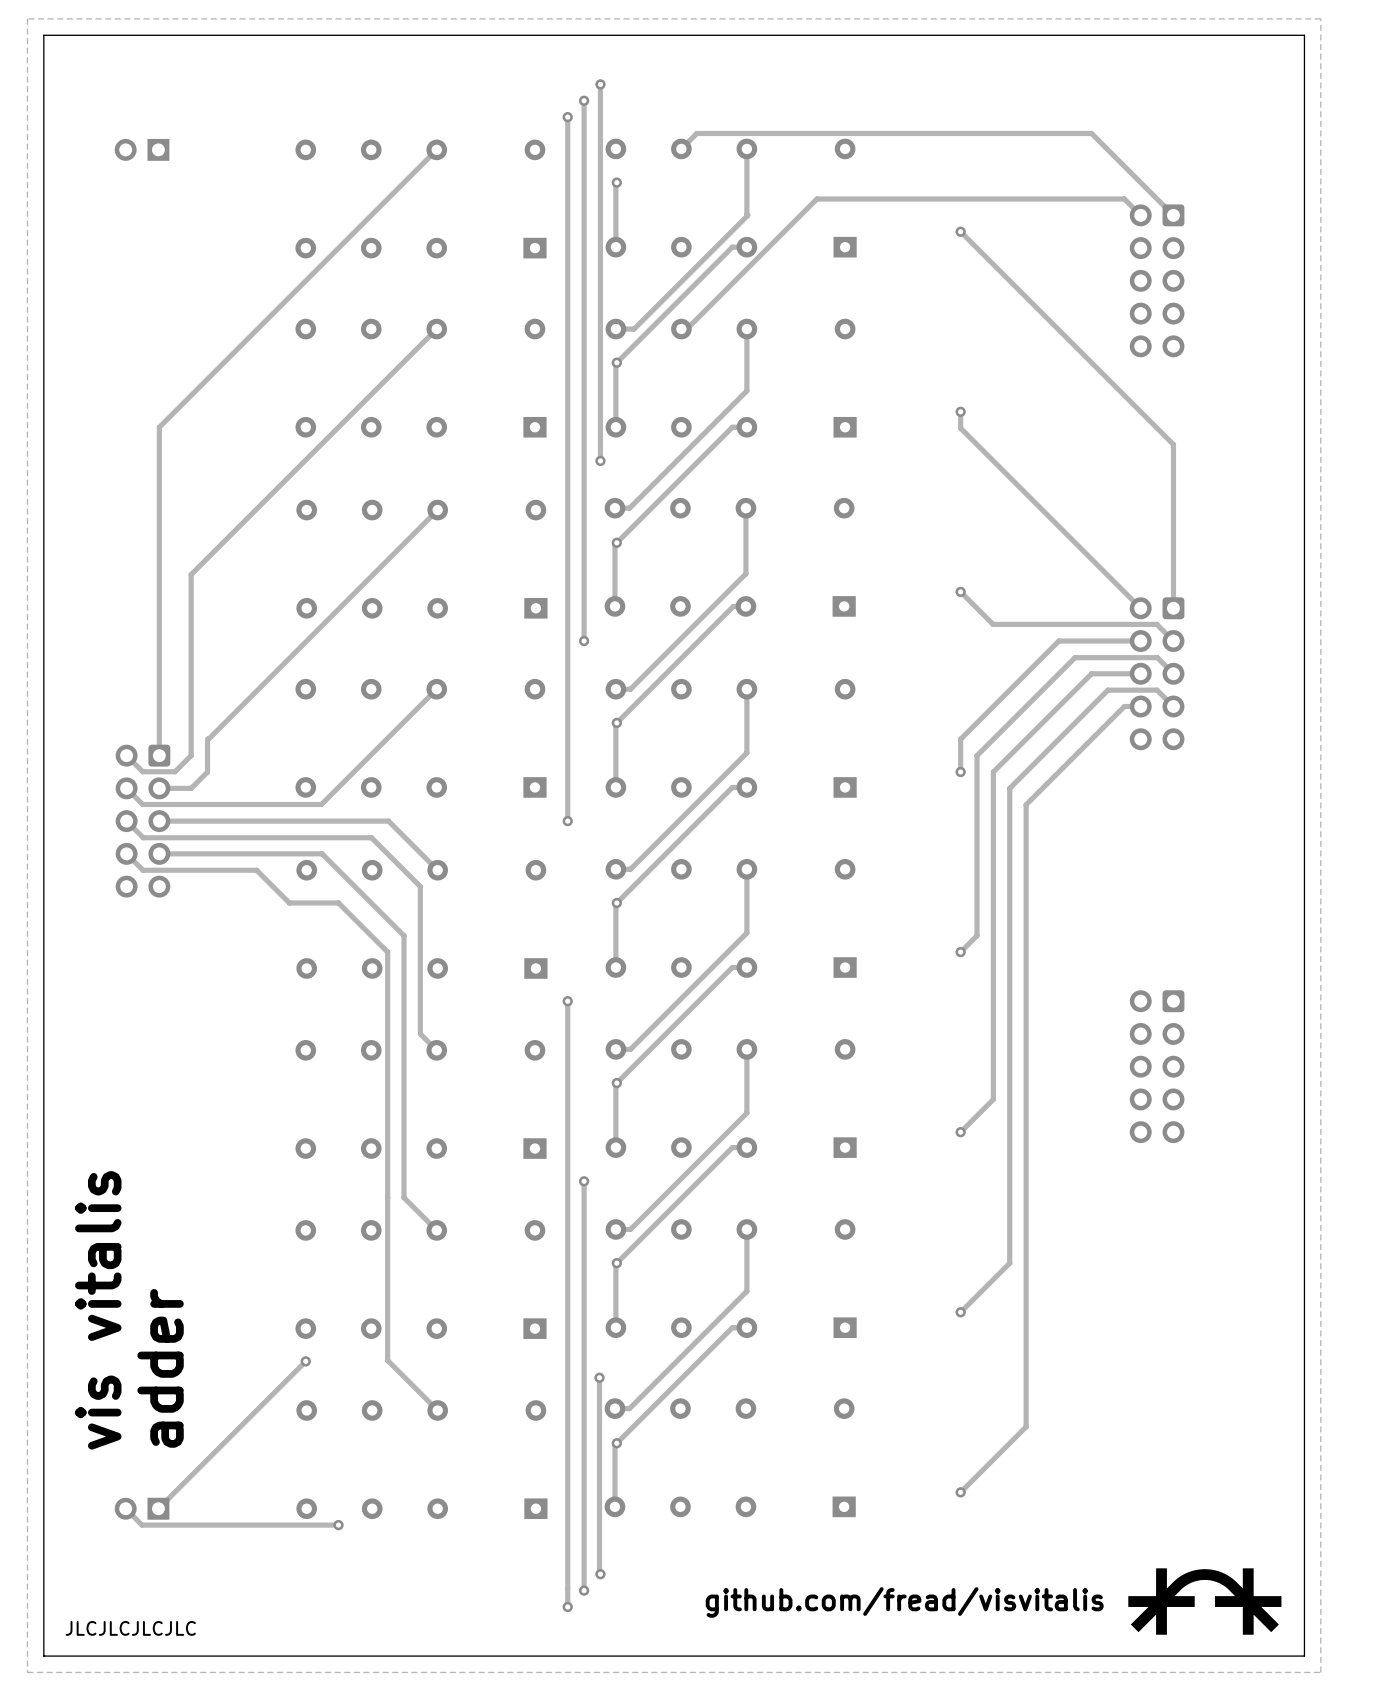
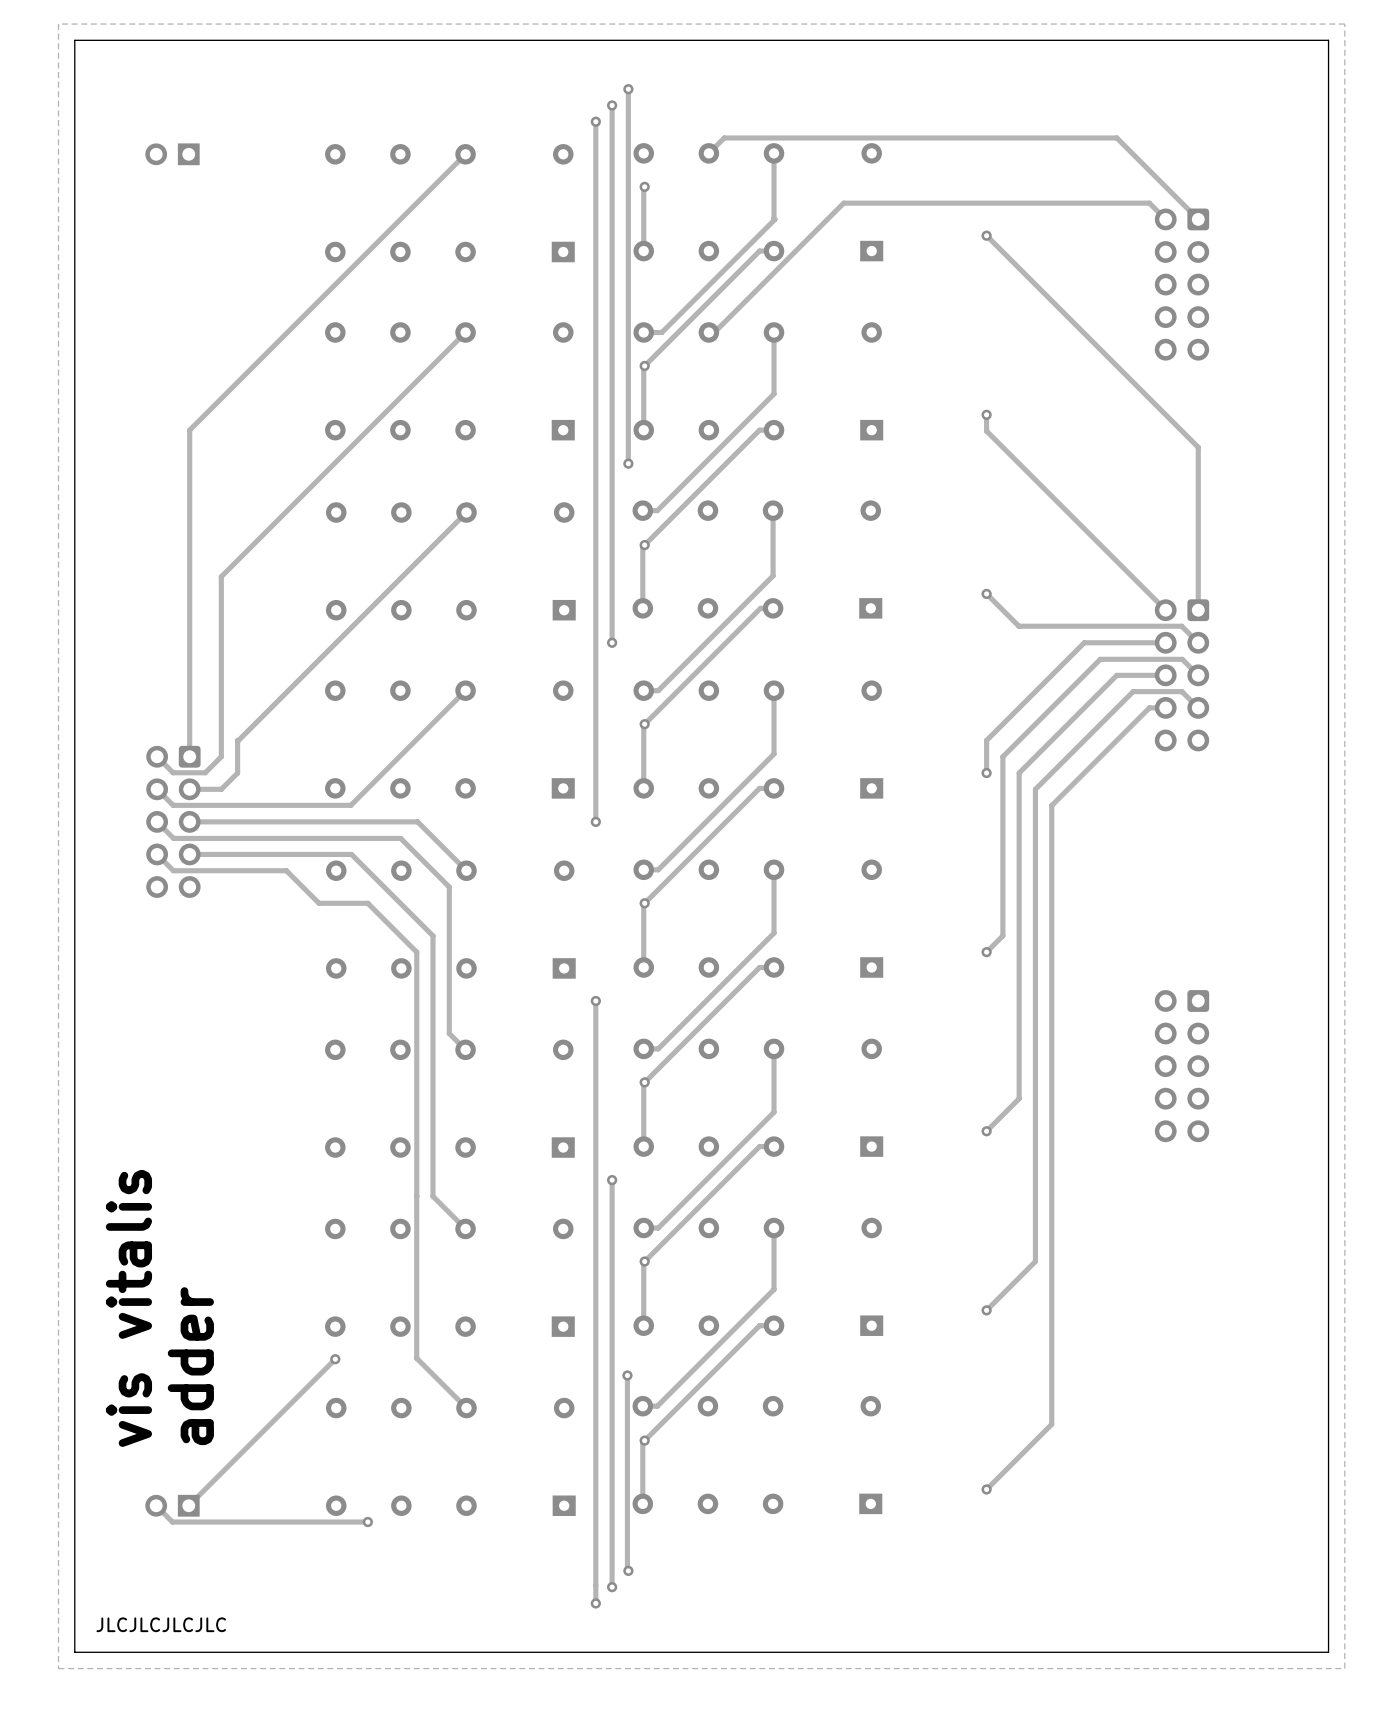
drawing: [1128, 1568, 1282, 1635] -> none
text: github.com/fread/visvitalis (904, 1602) -> none

